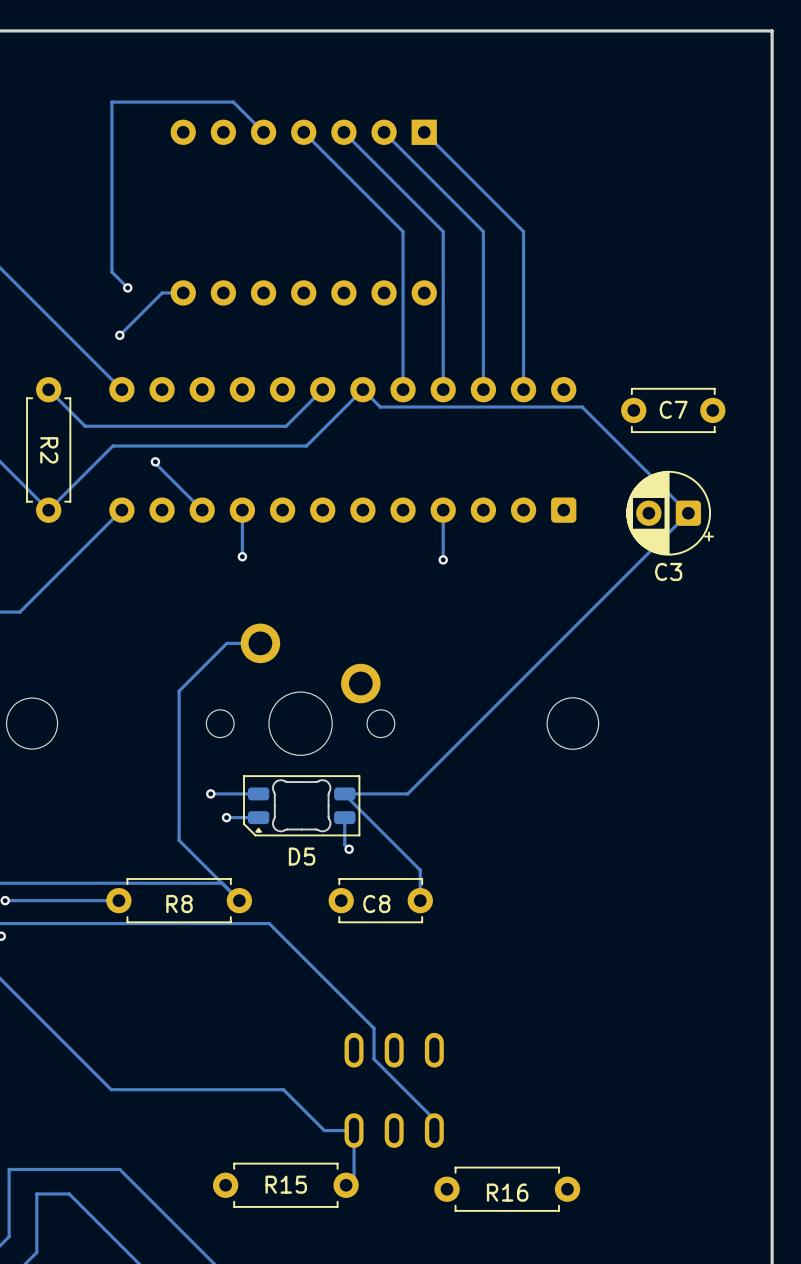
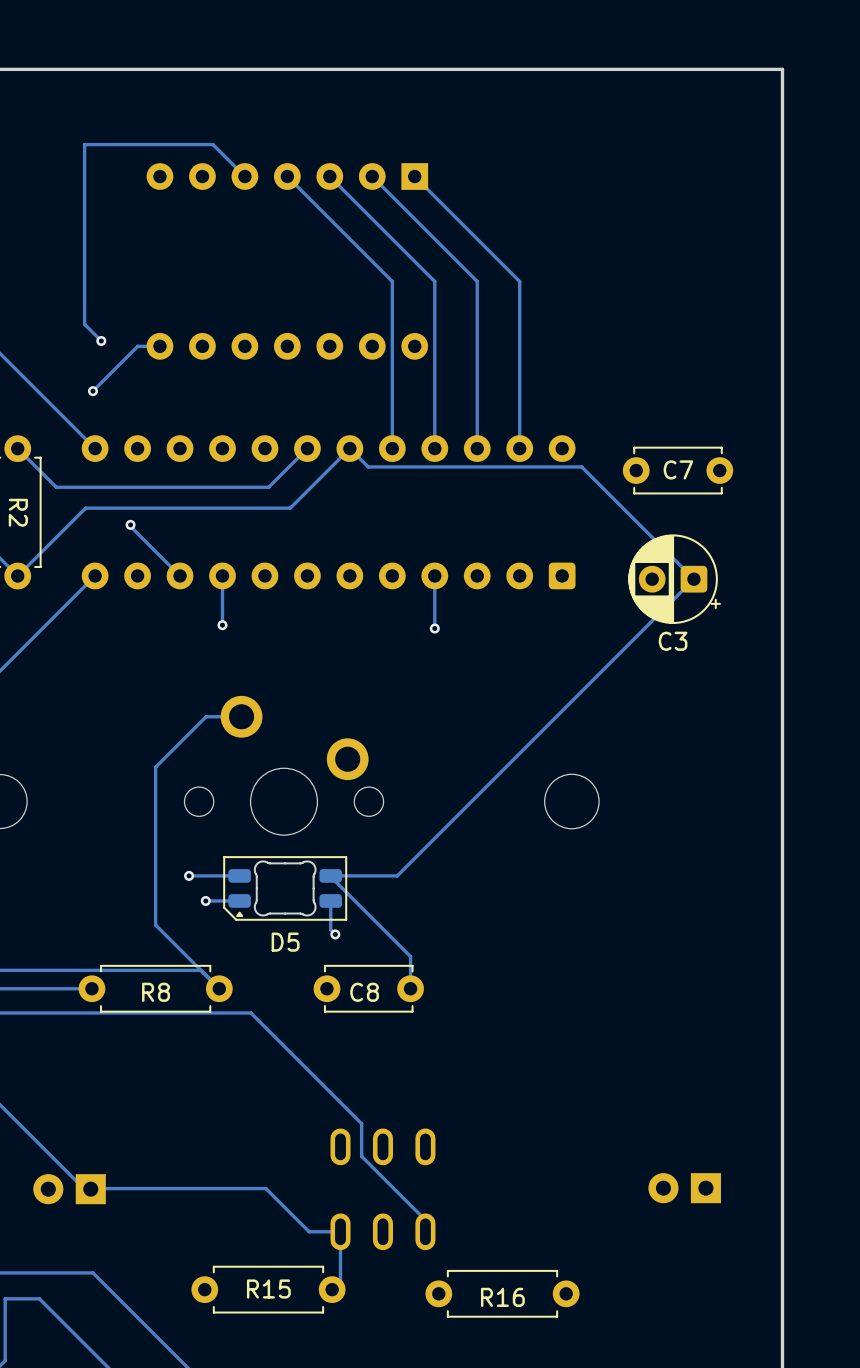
part: none -> (684, 1188)
part: none -> (69, 1189)

